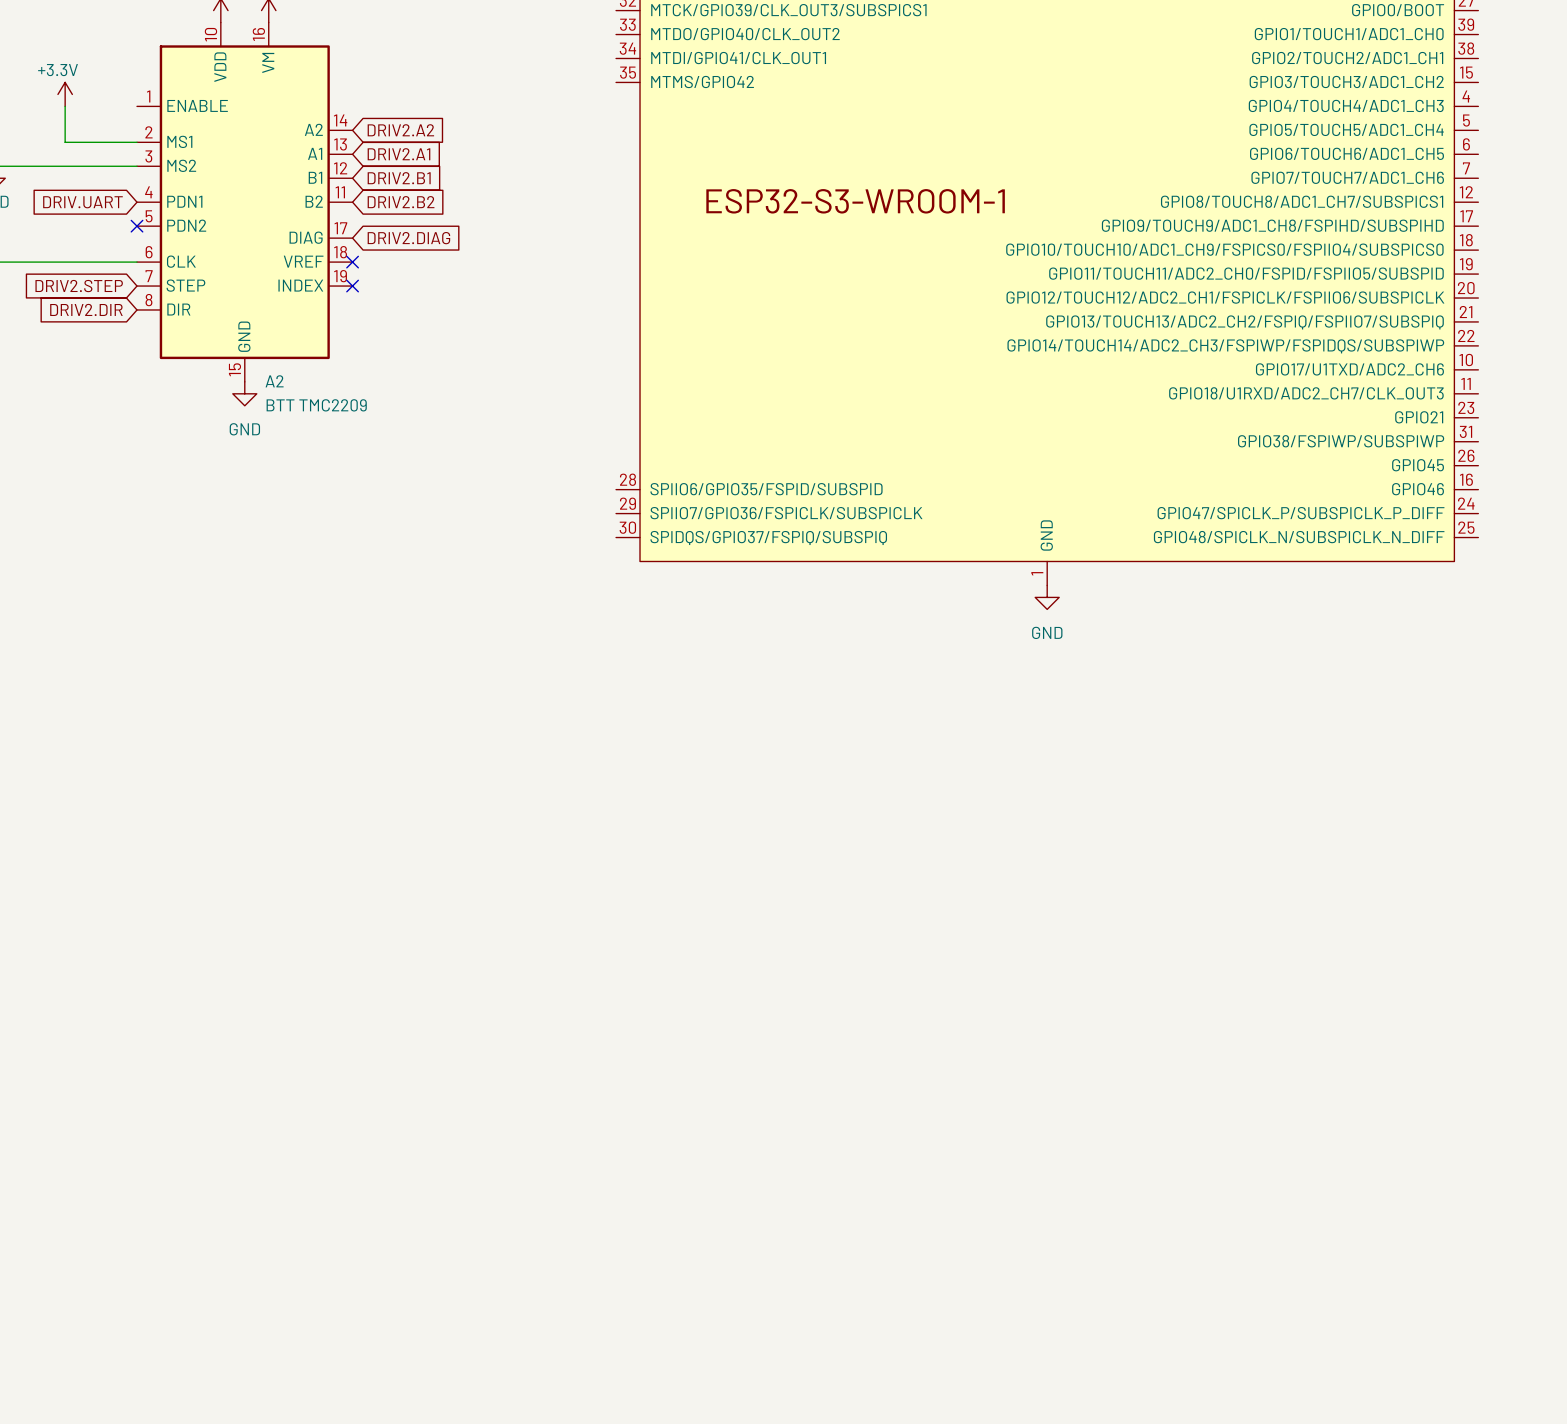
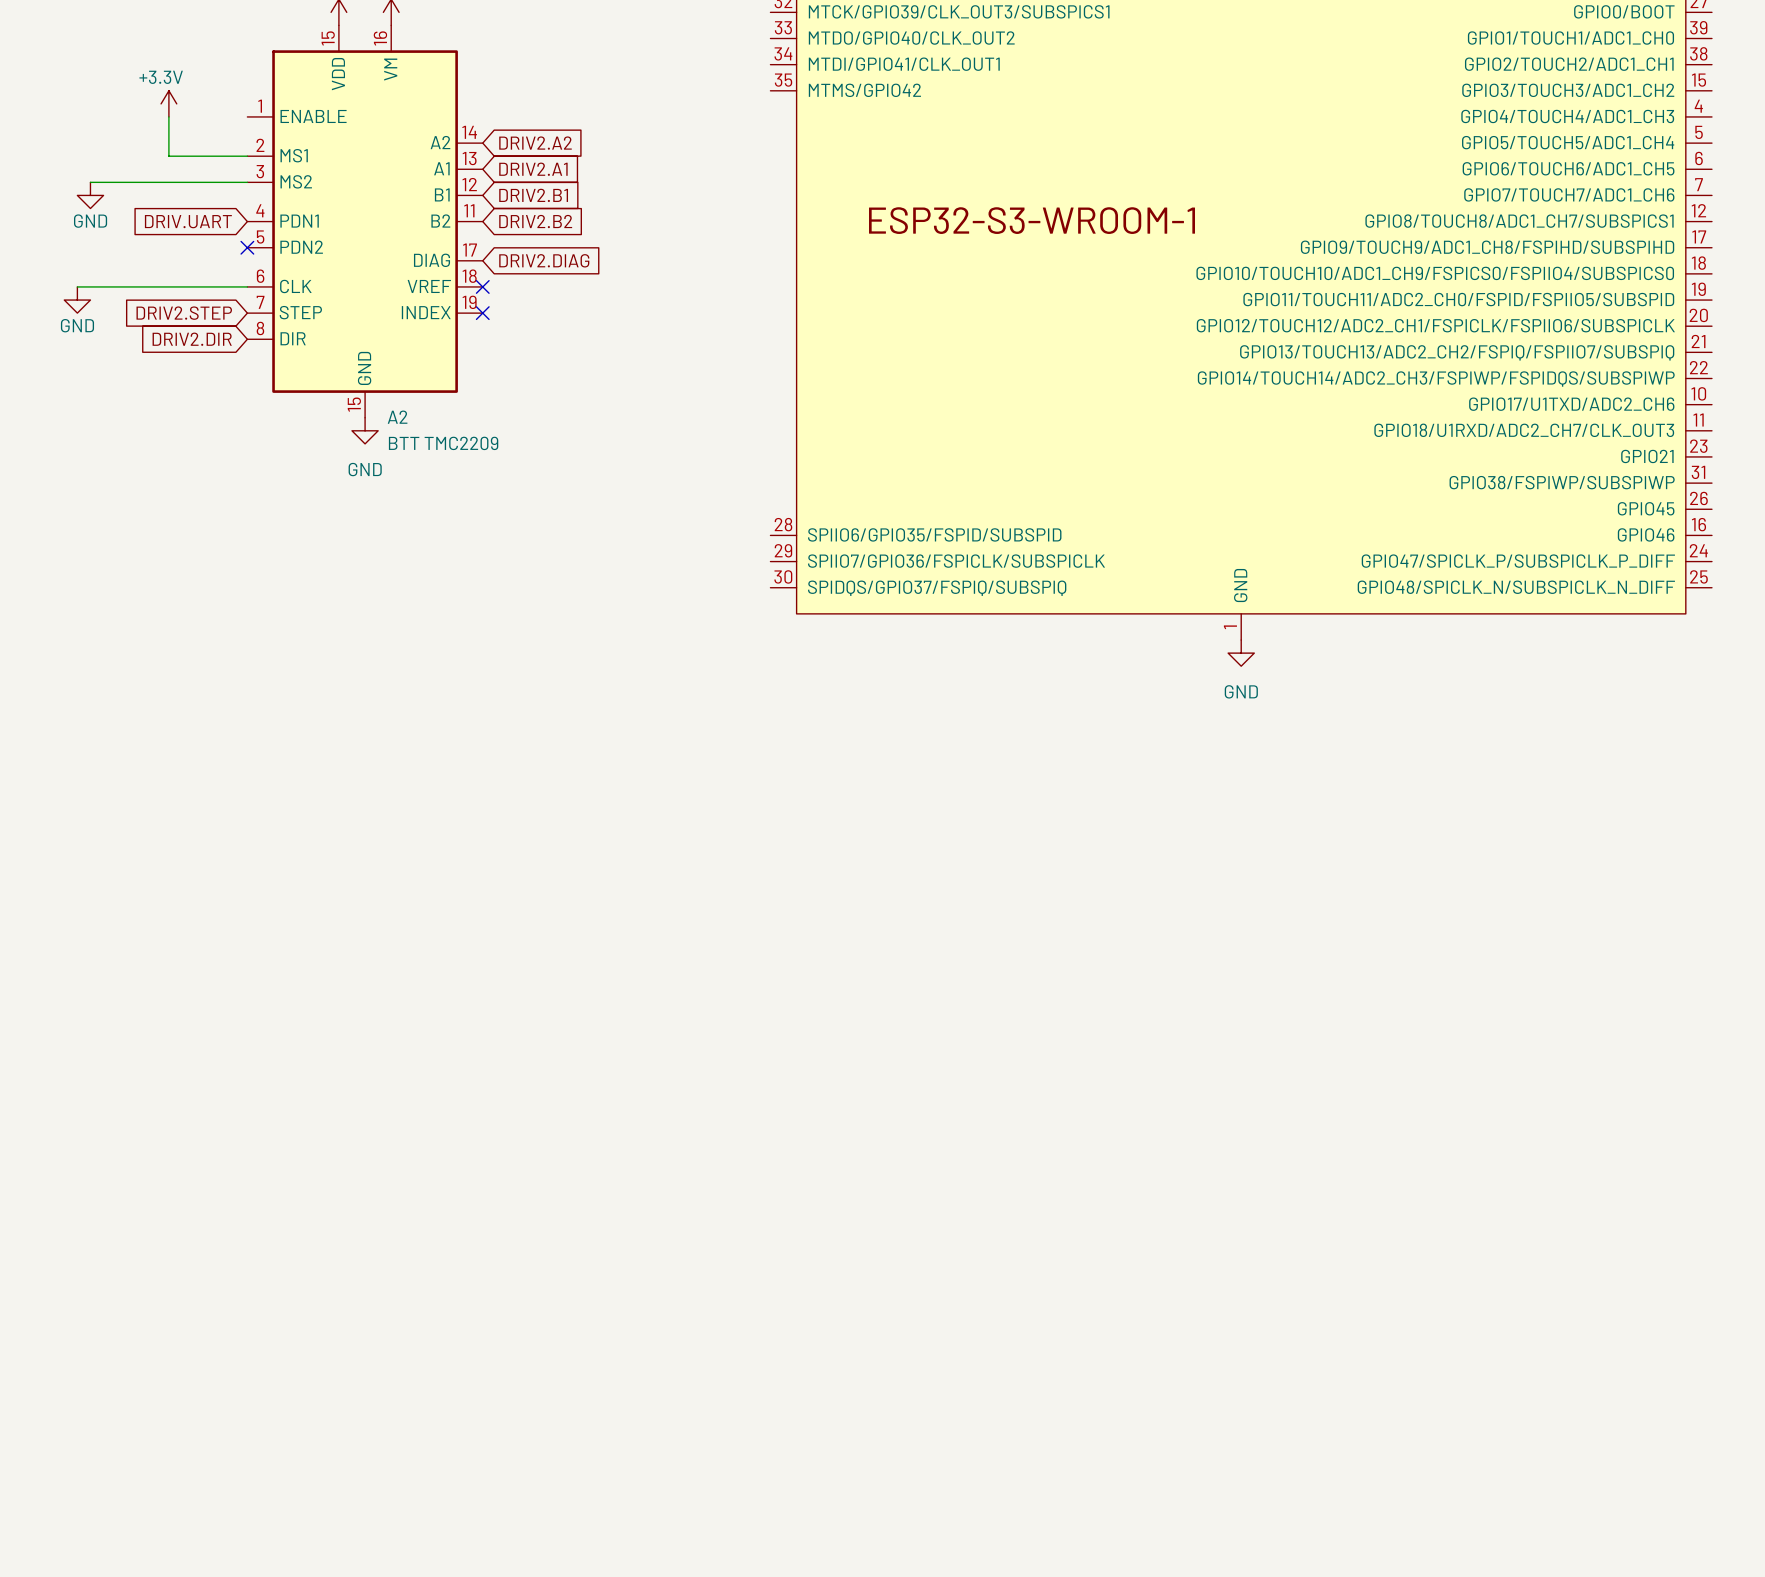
A2 pin number: 10 (210, 34) -> 15 (328, 38)

